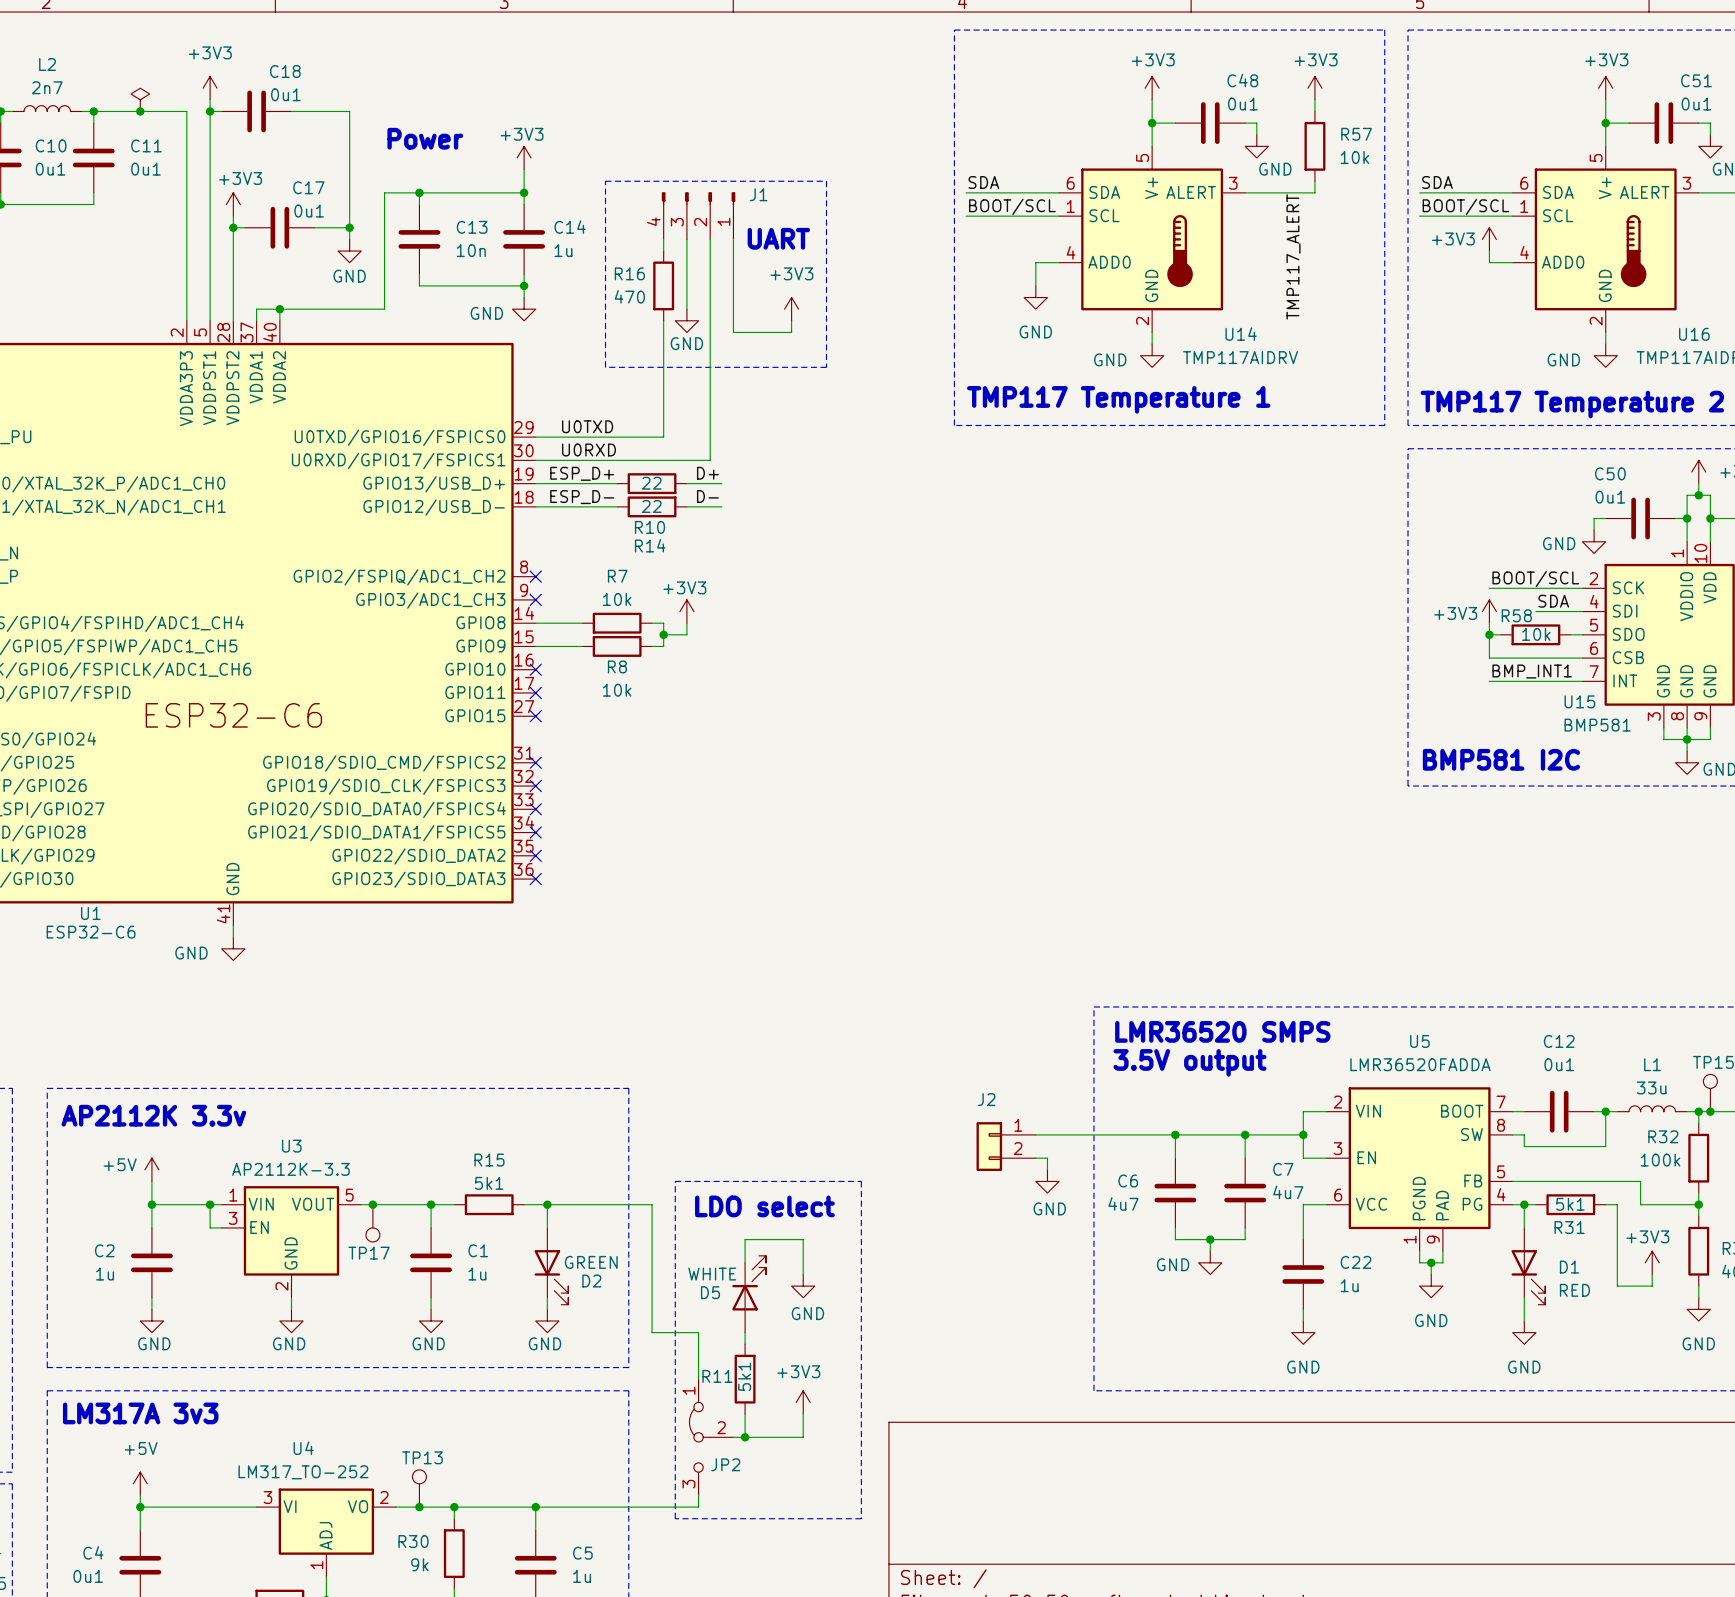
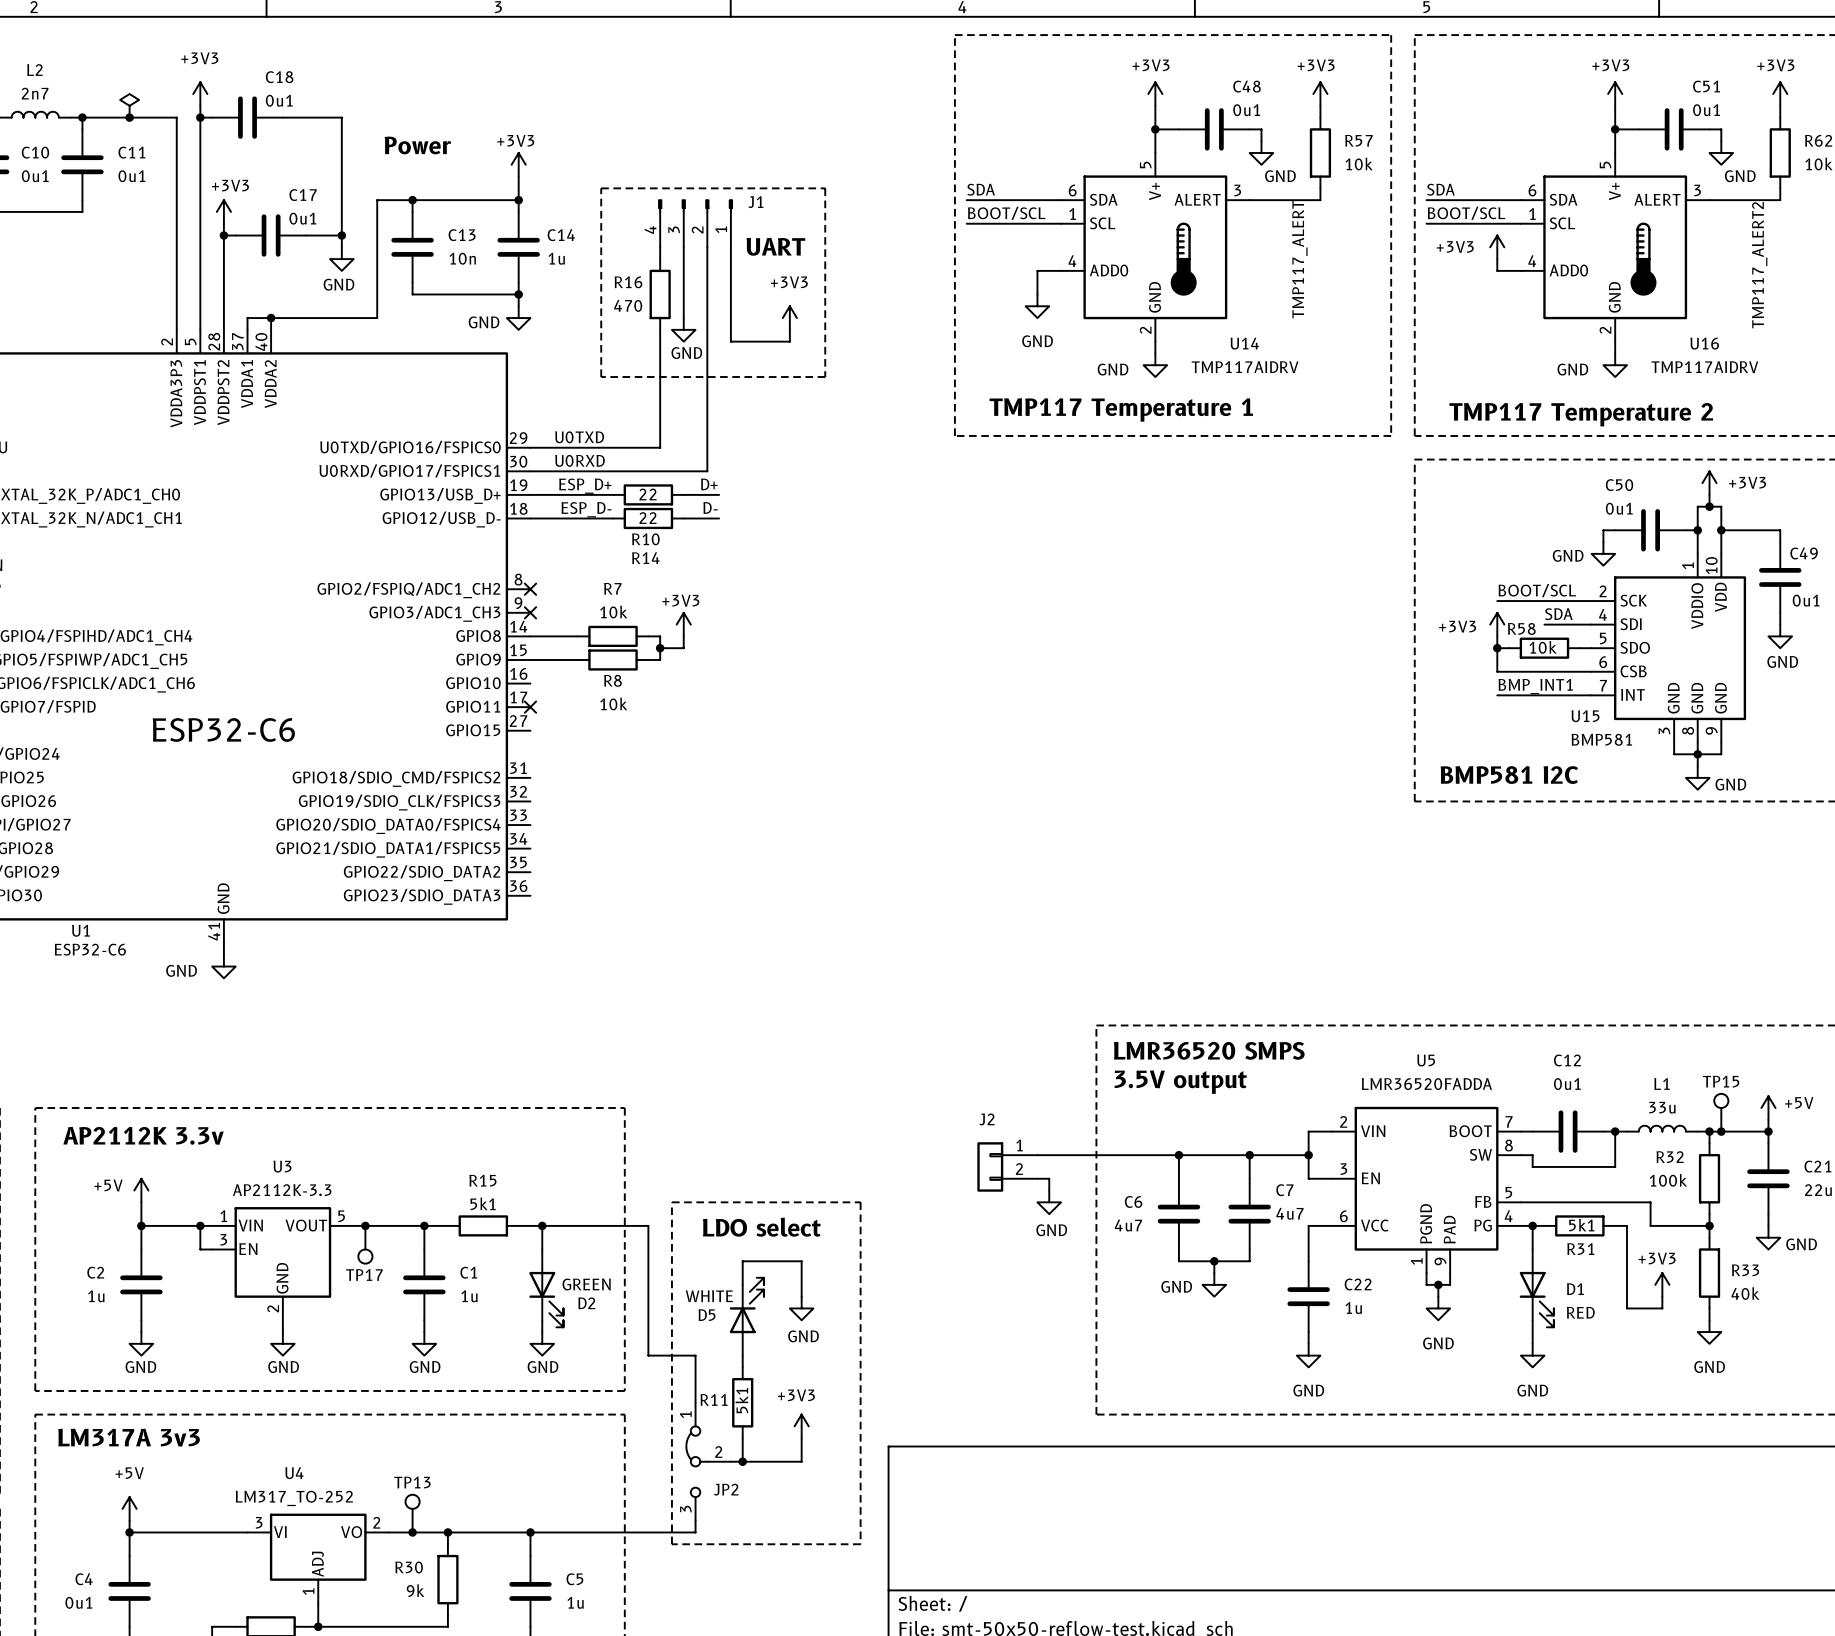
no-connect mark: (535, 669) -> none
no-connect mark: (535, 716) -> none
no-connect mark: (535, 762) -> none
no-connect mark: (535, 786) -> none
no-connect mark: (535, 809) -> none
no-connect mark: (535, 832) -> none
no-connect mark: (535, 855) -> none
no-connect mark: (535, 879) -> none

